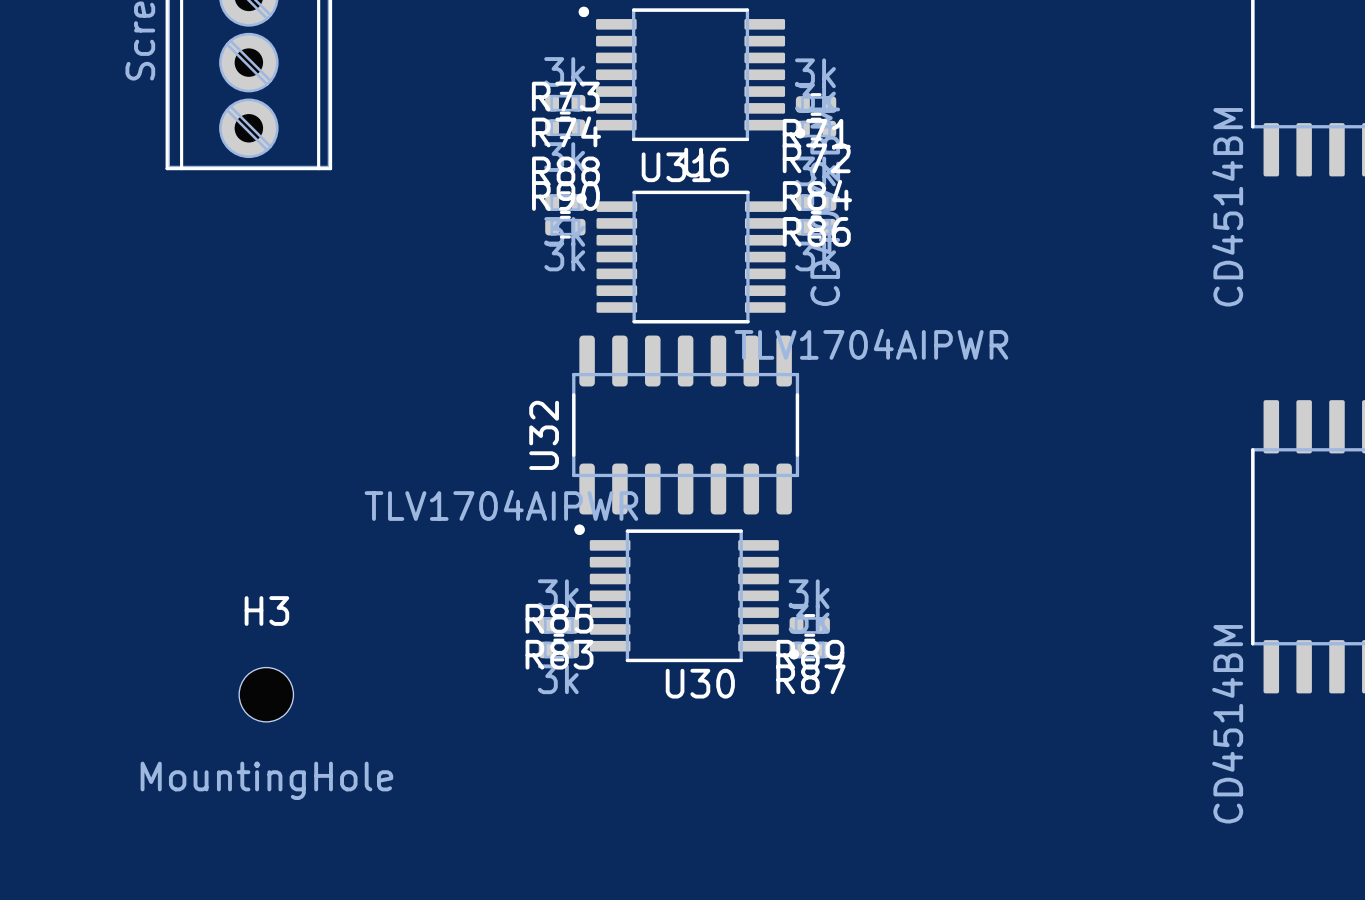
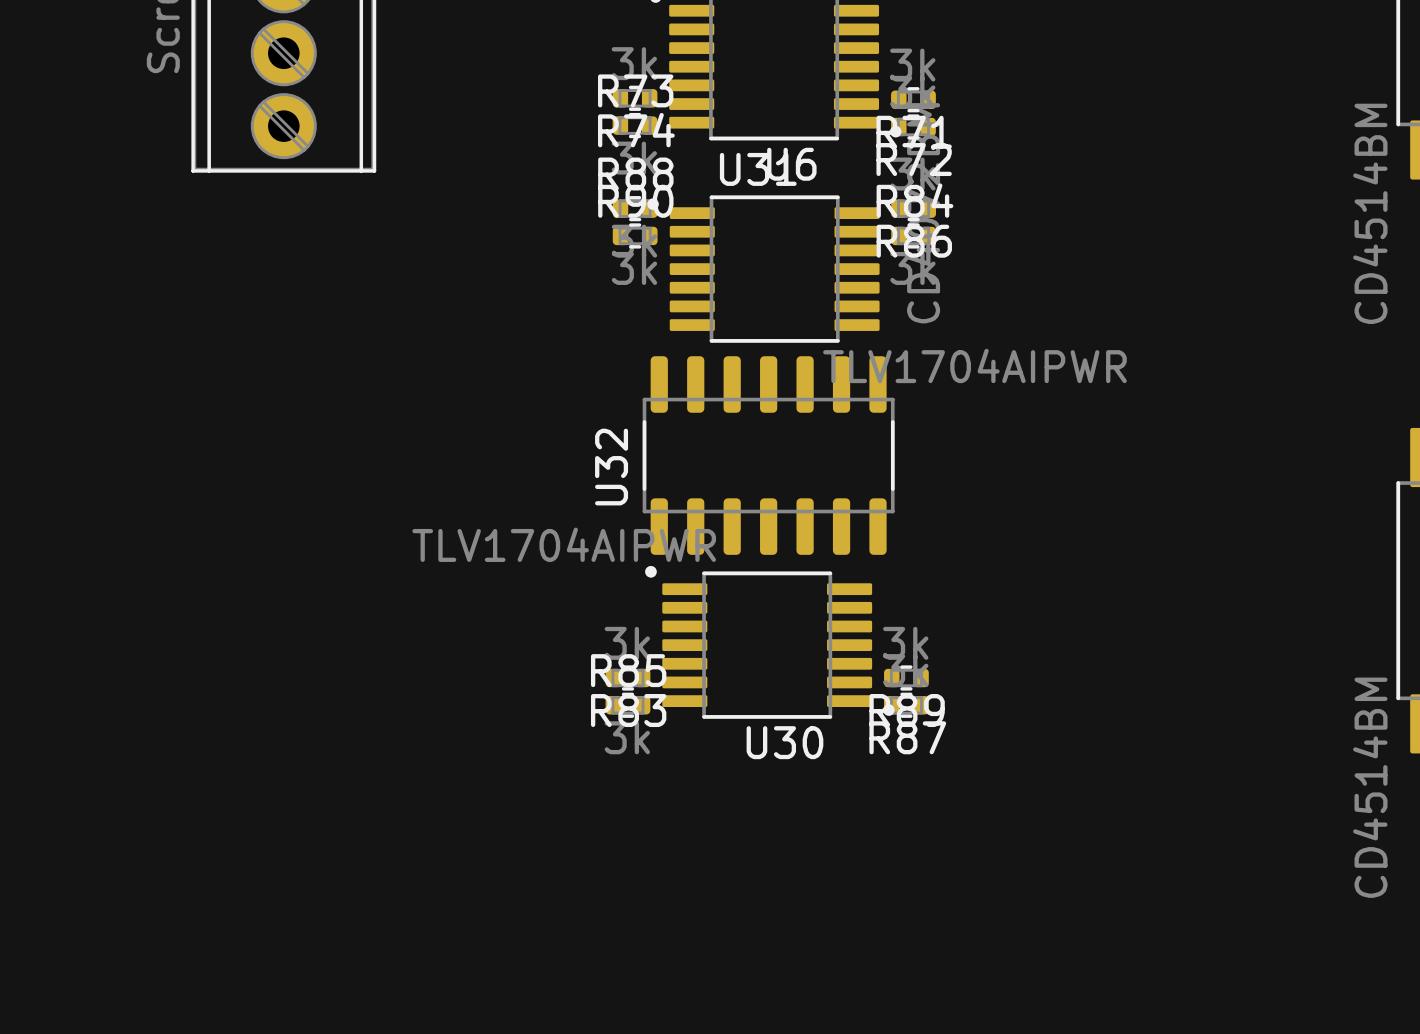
H3: MountingHole (266, 694) -> none

